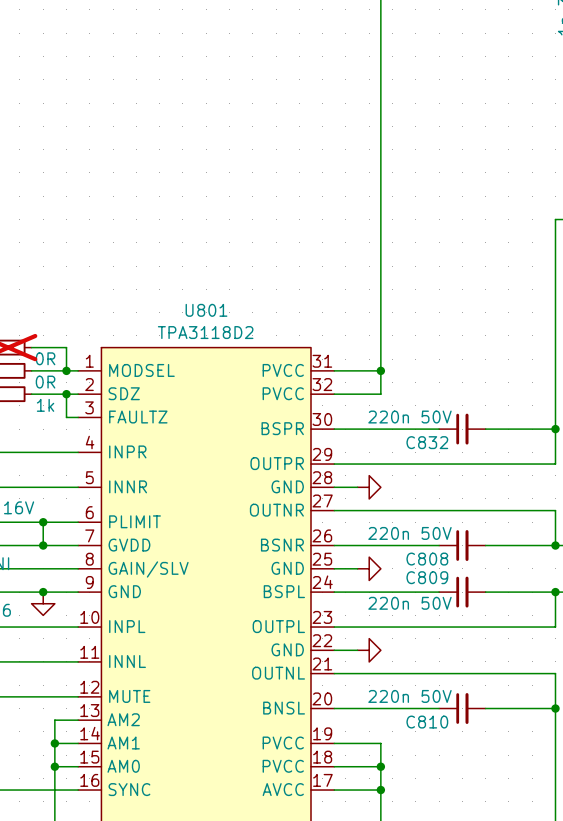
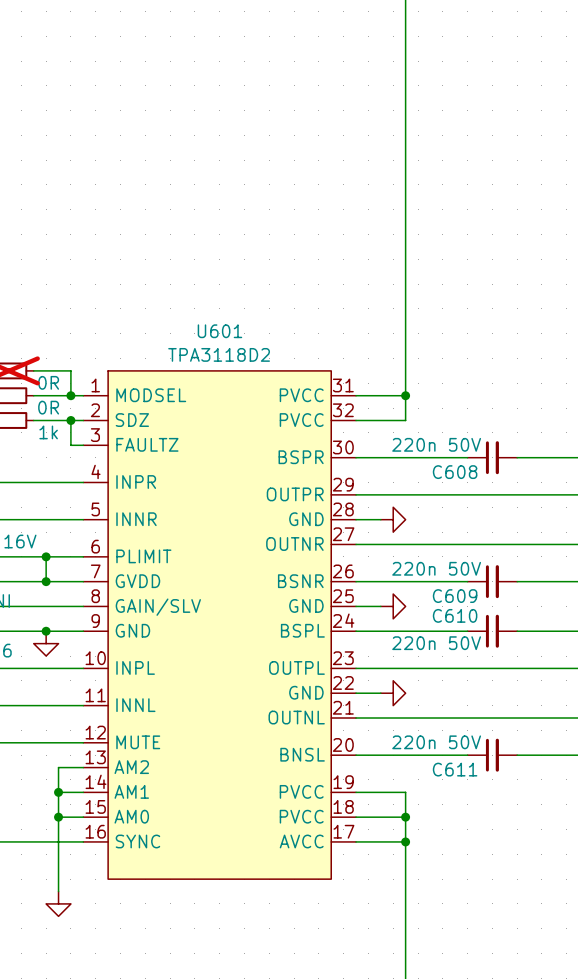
U801 name: U801 (206, 310) -> U601 (219, 331)
C832 name: C832 (427, 442) -> C608 (455, 472)
C808 name: C808 (427, 559) -> C609 (455, 596)
C809 name: C809 (427, 577) -> C610 (455, 615)
C810 name: C810 (427, 722) -> C611 (455, 769)

